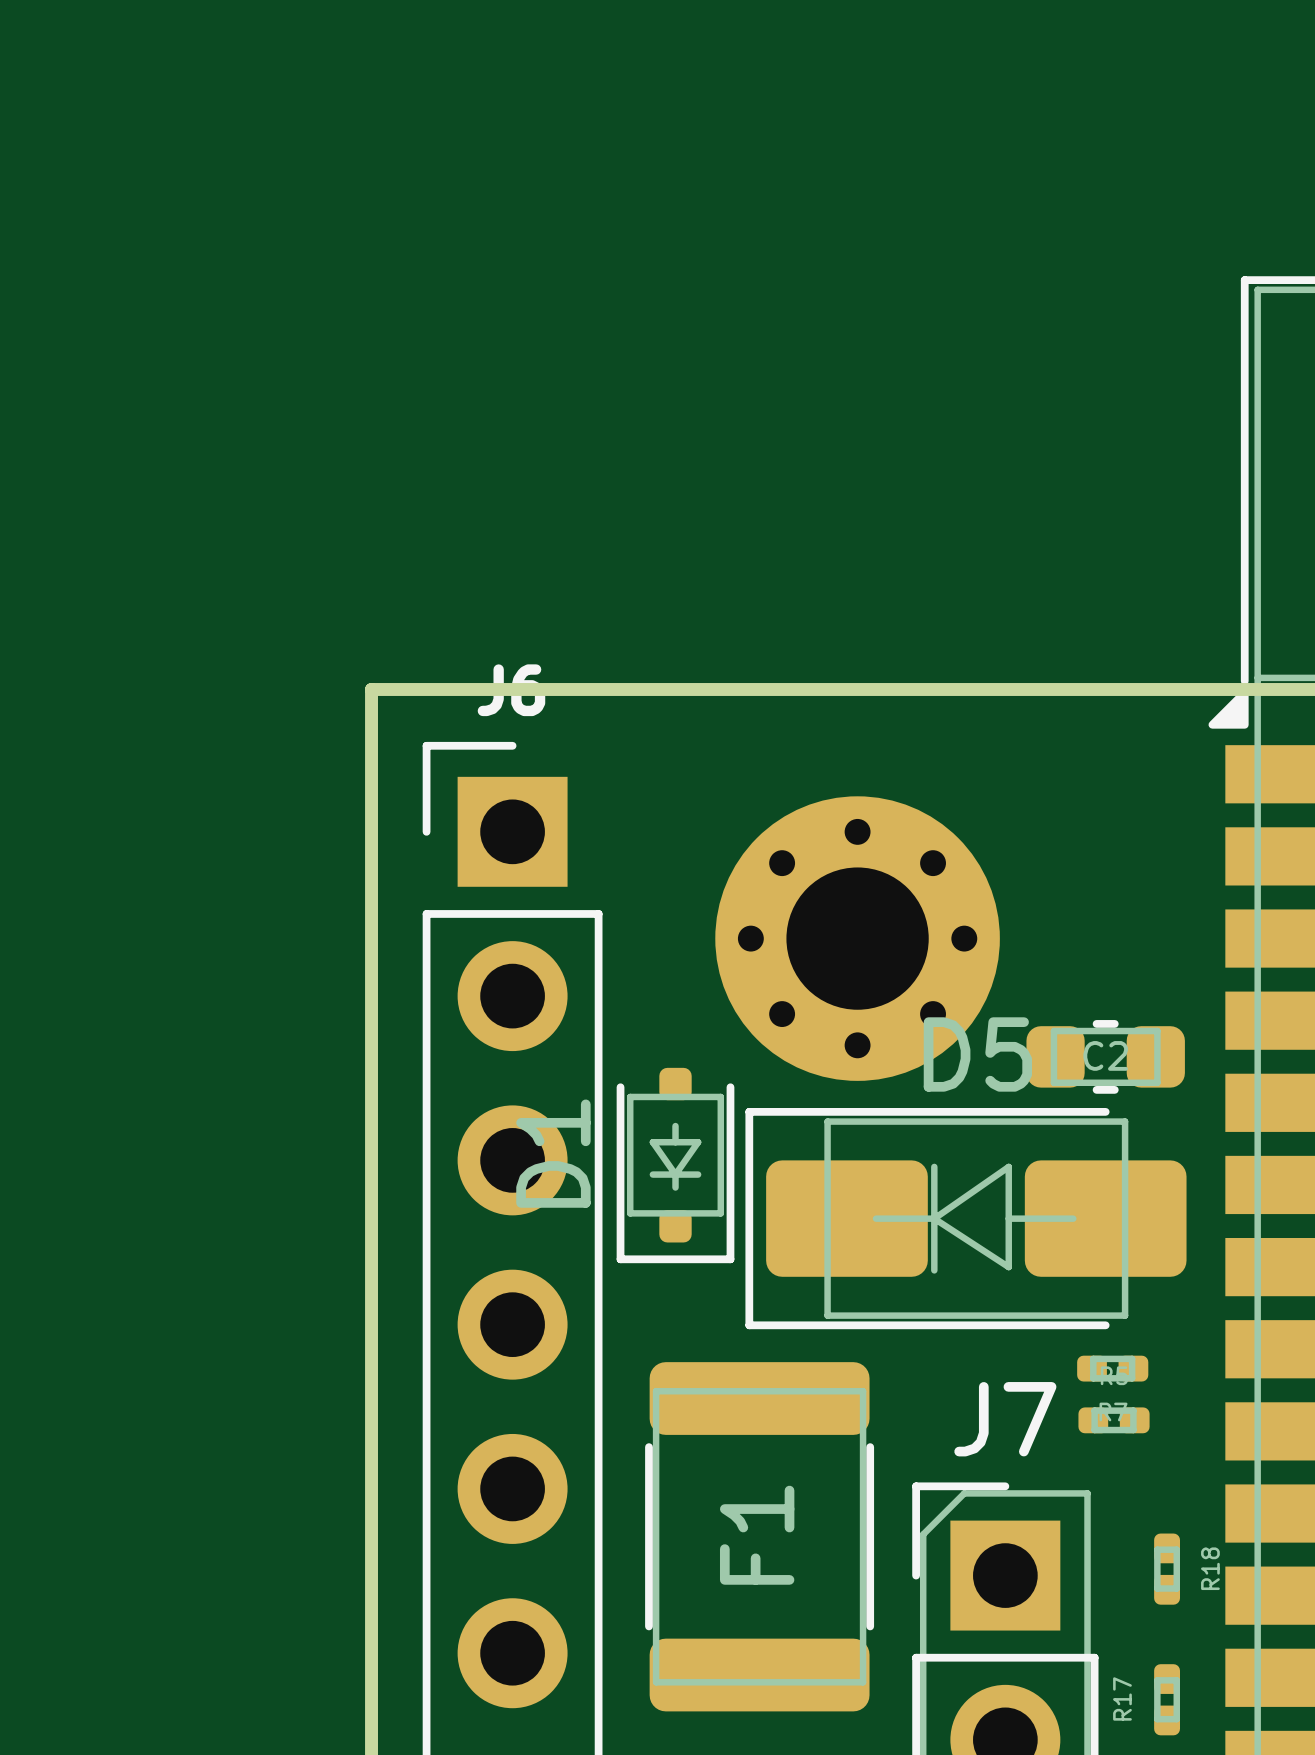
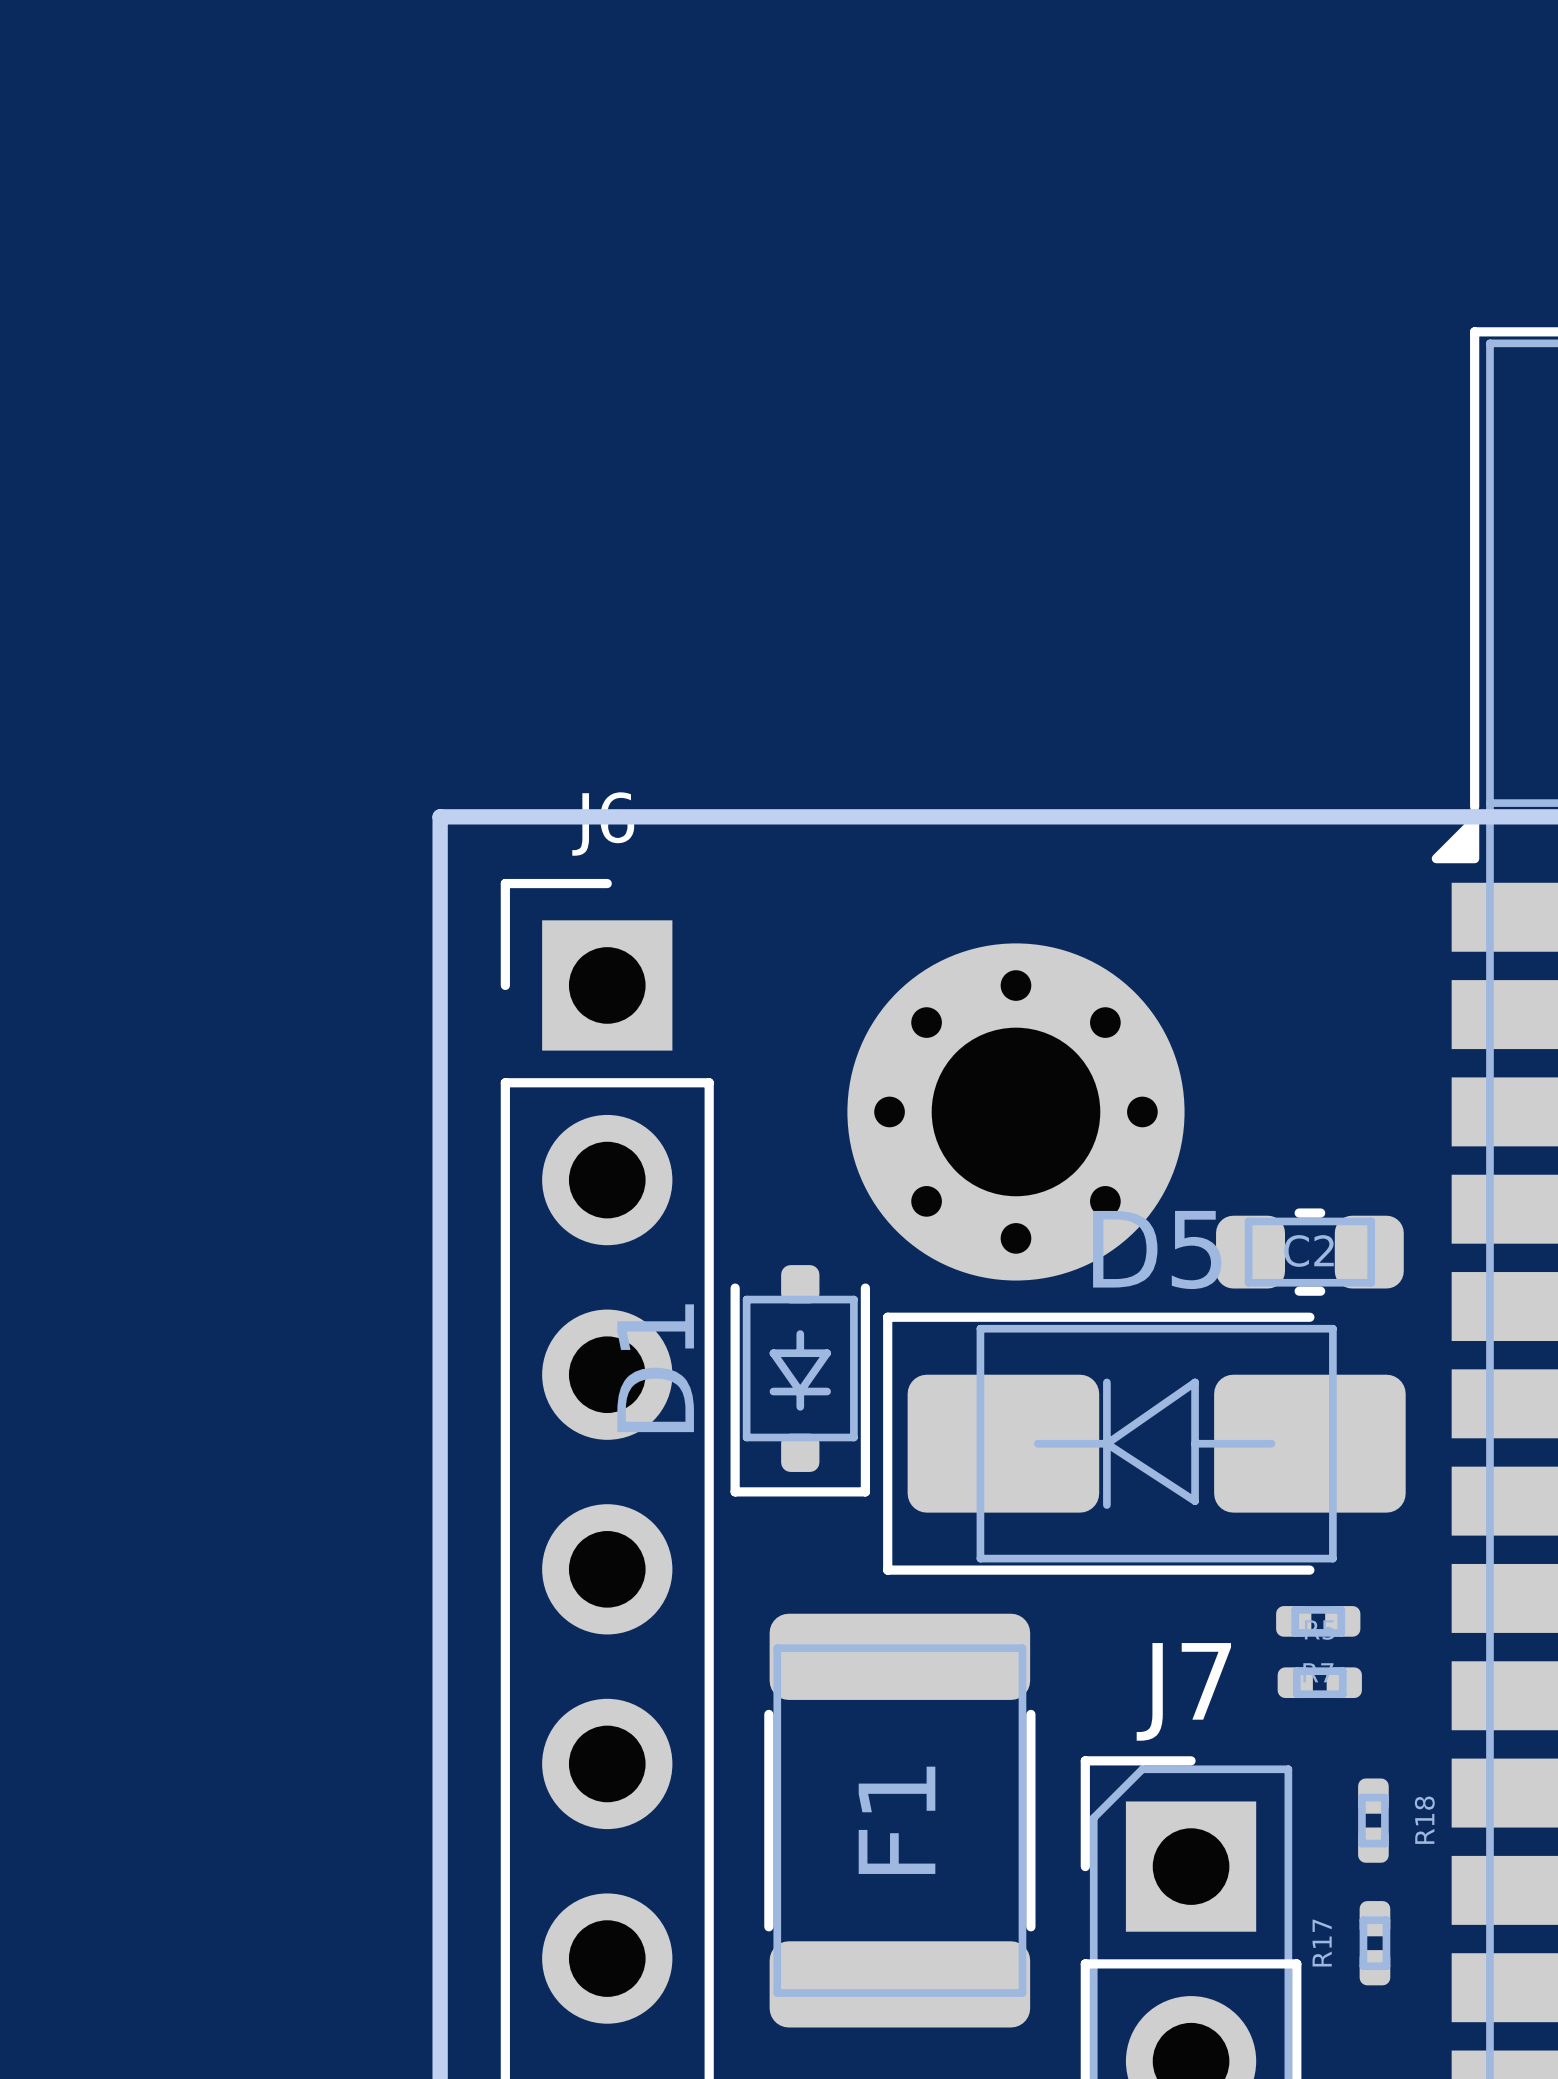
R18 position: (1167, 1569) -> (1373, 1820)
R17 position: (1167, 1699) -> (1374, 1943)

